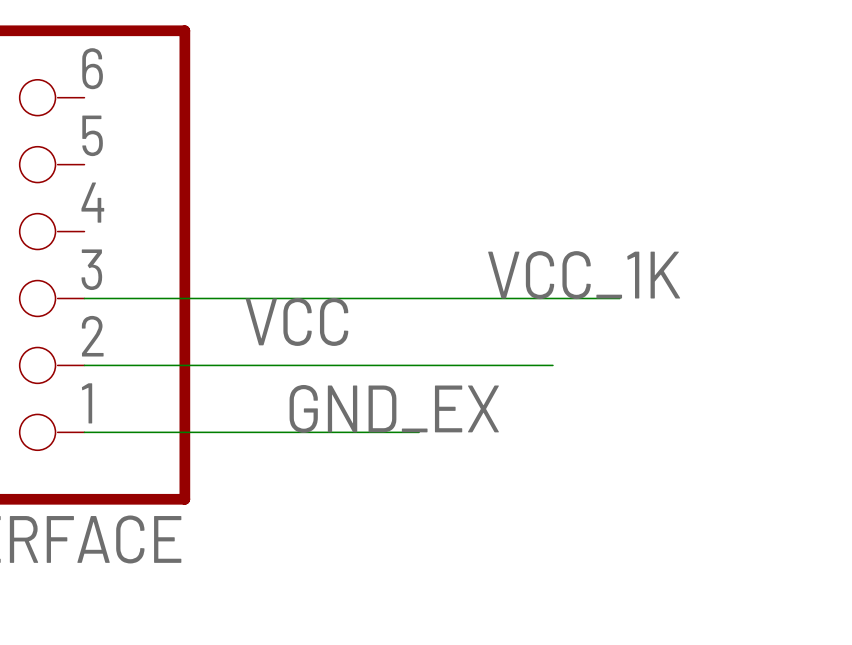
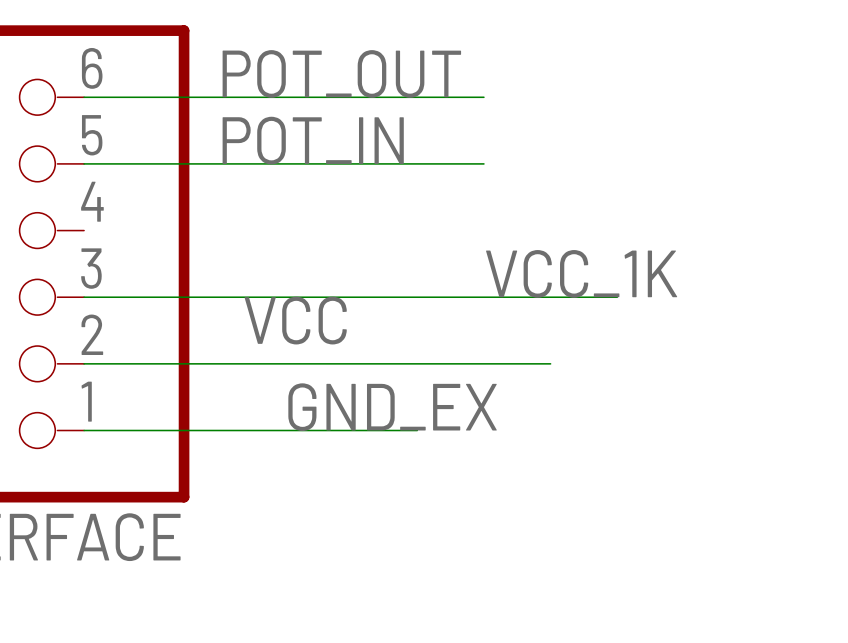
label: none -> POT_OUT (341, 73)
wire: none -> (84, 97) (483, 97)
label: none -> POT_IN (313, 140)
wire: none -> (84, 163) (483, 163)

